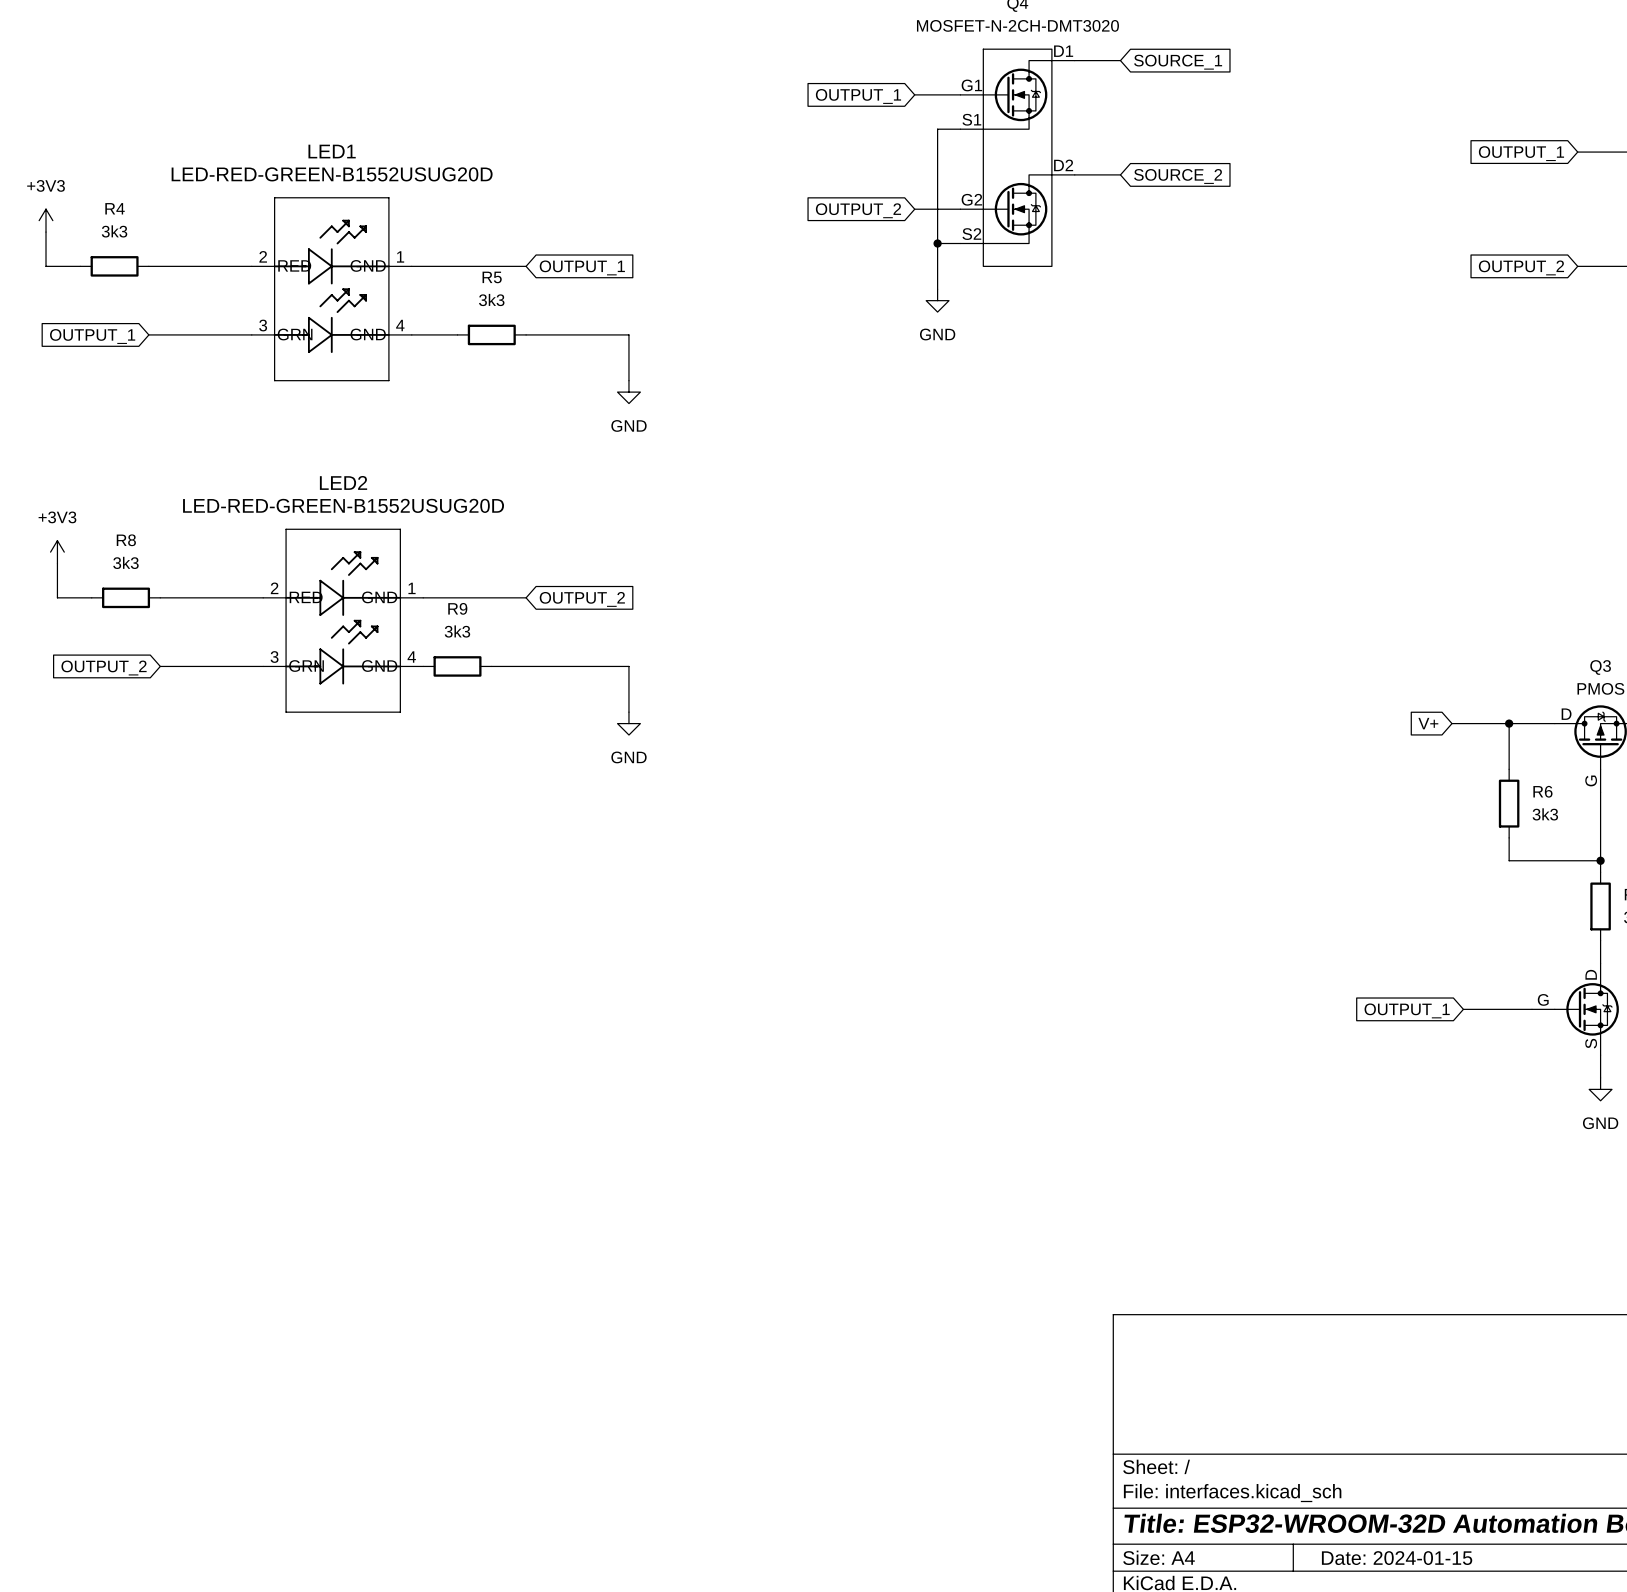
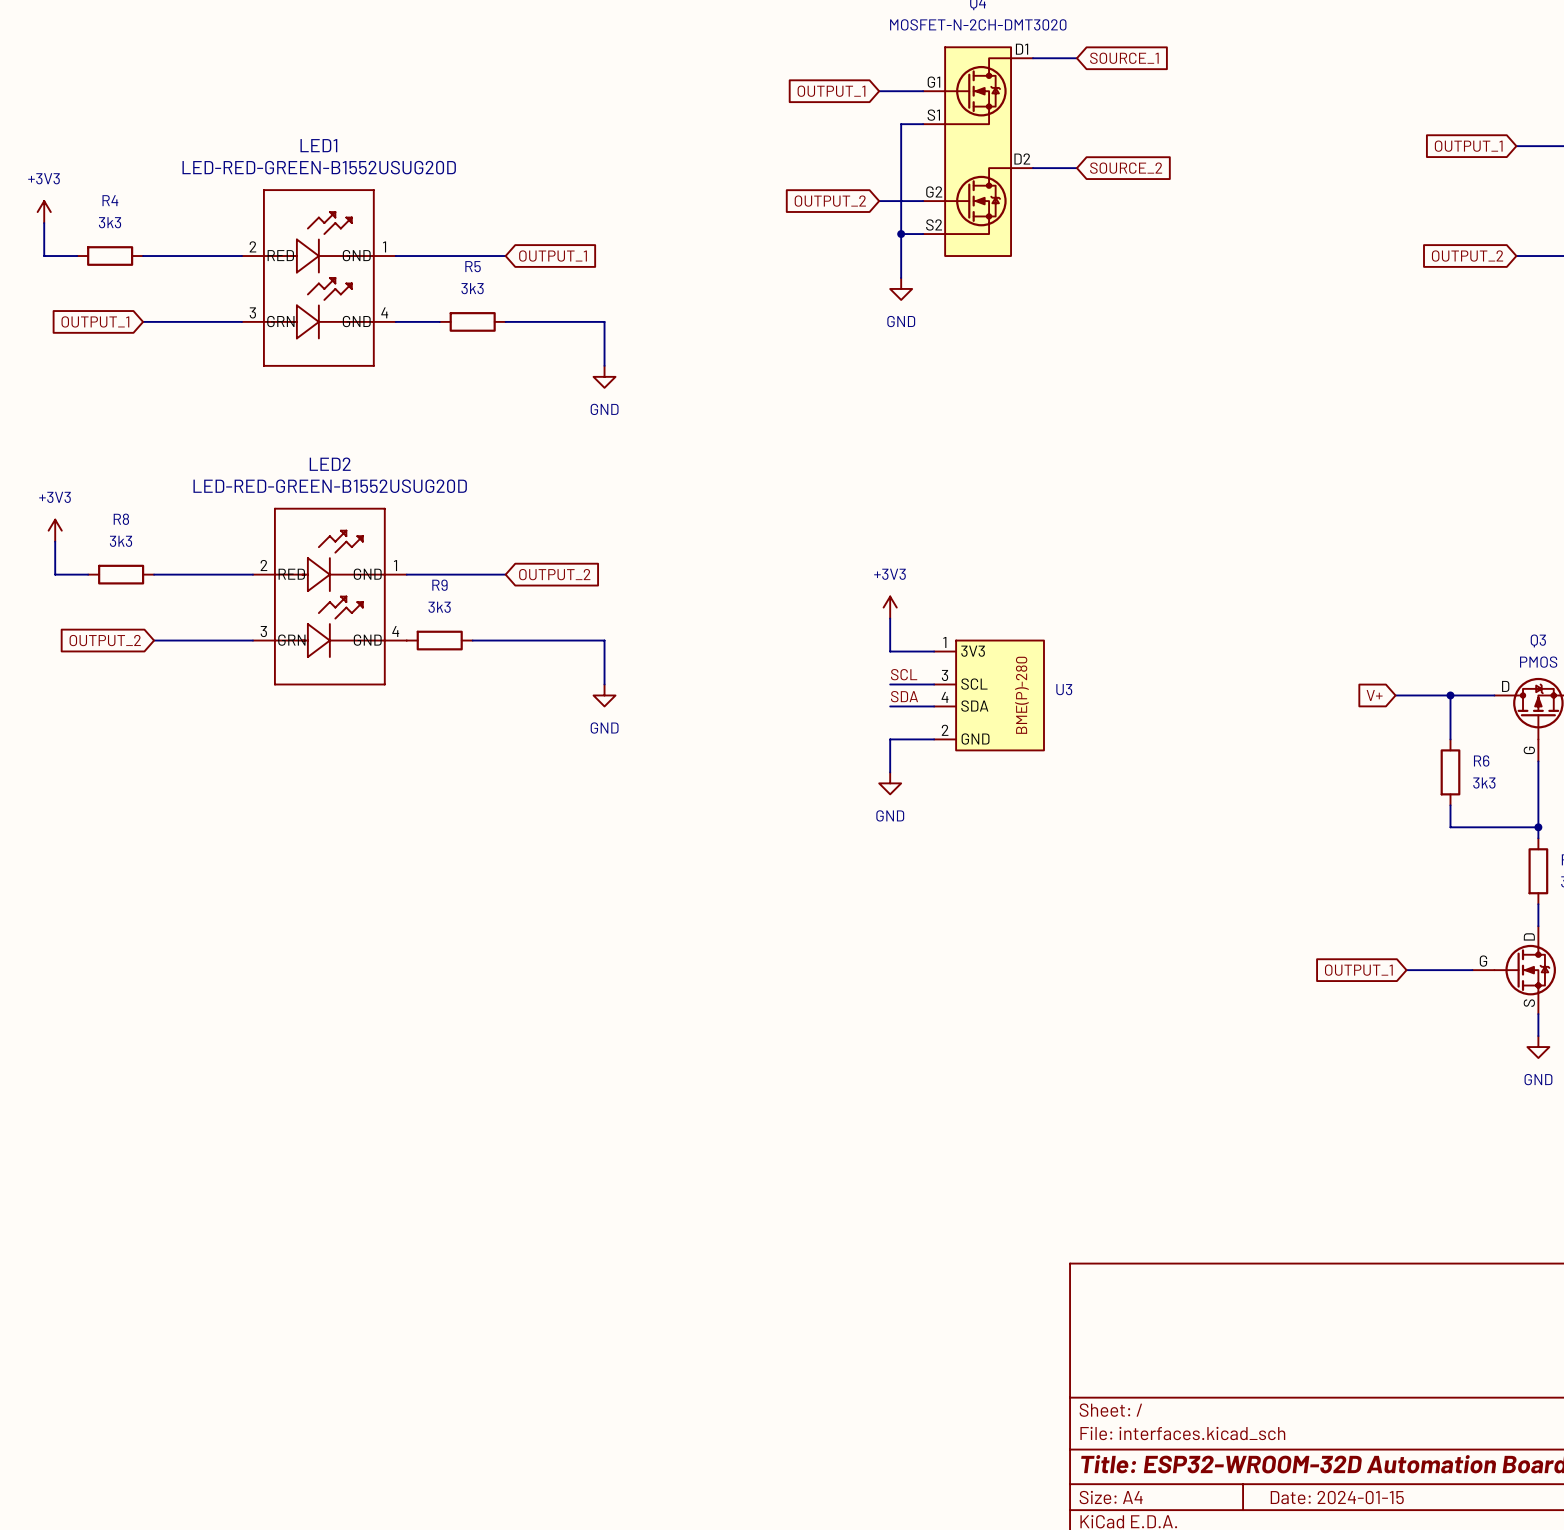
power symbol: none -> +3V3 (890, 607)
wire: none -> (890, 618) (890, 651) (934, 651)
label: none -> SCL (904, 674)
wire: none -> (890, 684) (934, 684)
U3: none -> (989, 695)
label: none -> SDA (904, 696)
wire: none -> (890, 706) (934, 706)
wire: none -> (934, 739) (890, 739) (890, 772)
power symbol: none -> GND (890, 783)

